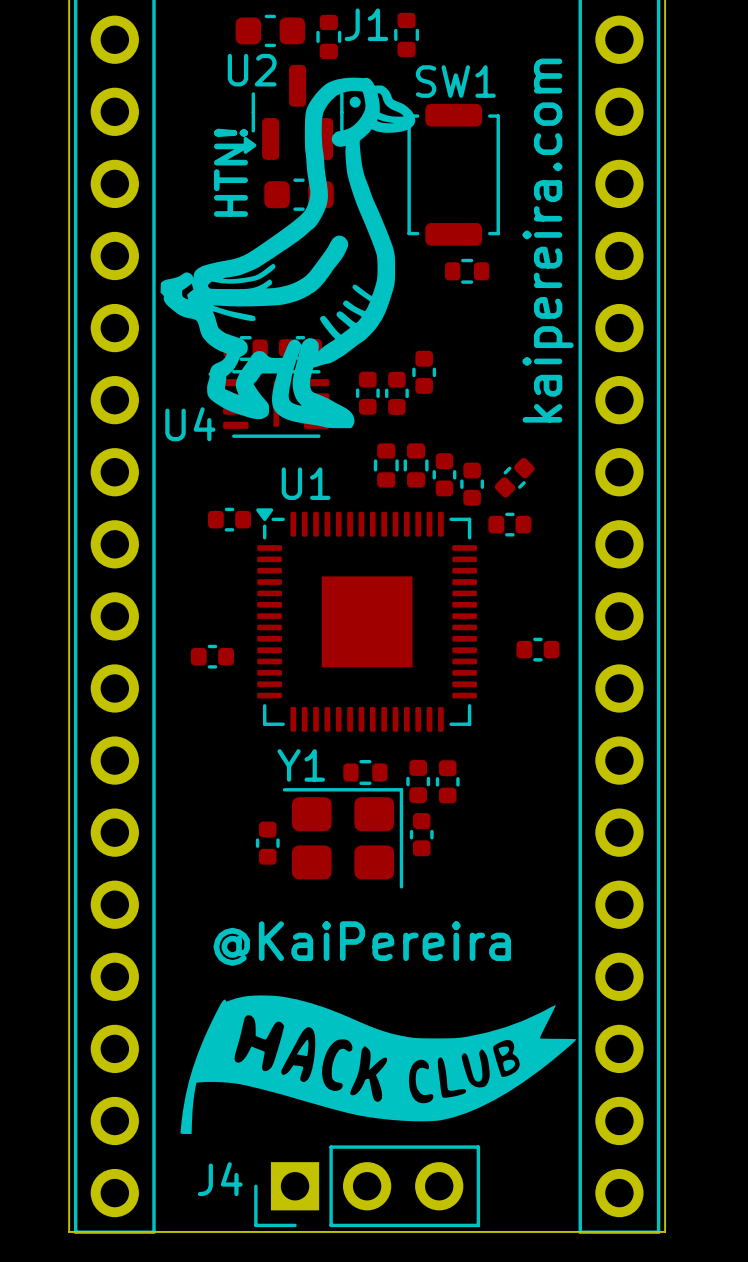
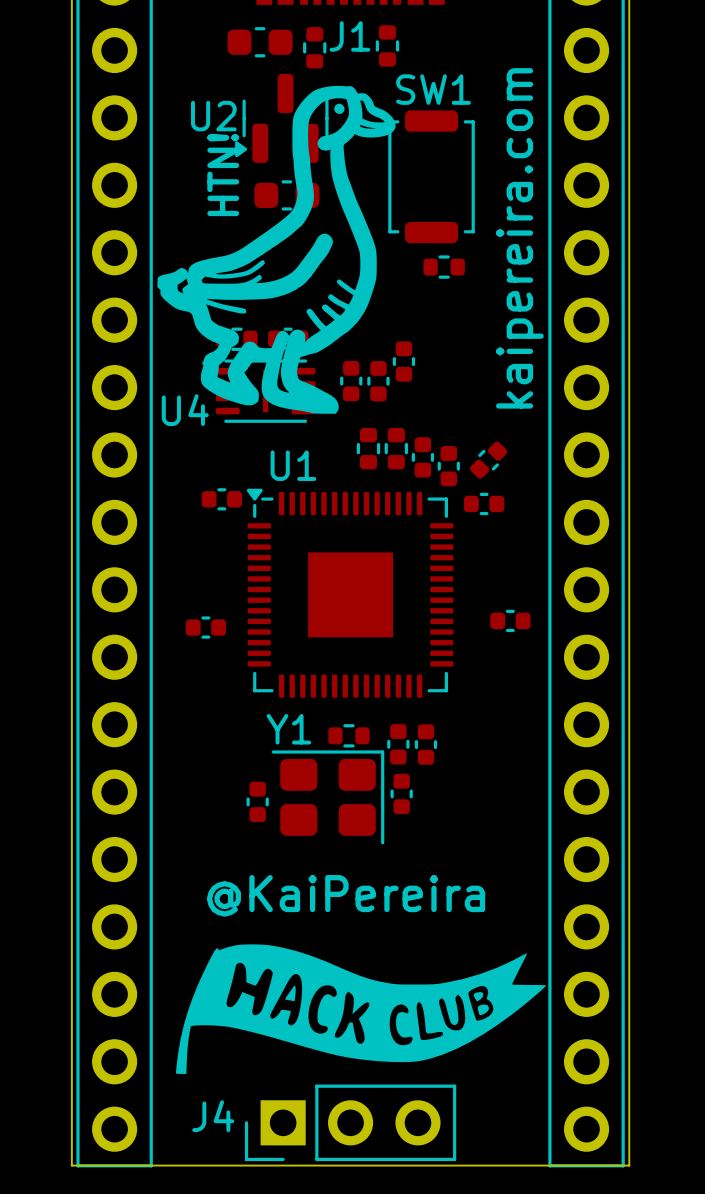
U2 name position: U2 (252, 70) -> U2 (213, 116)

